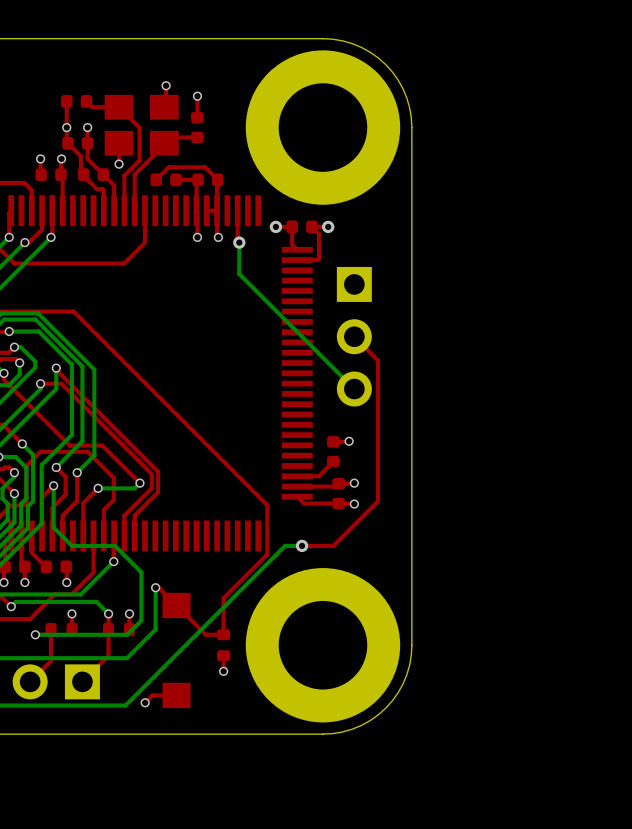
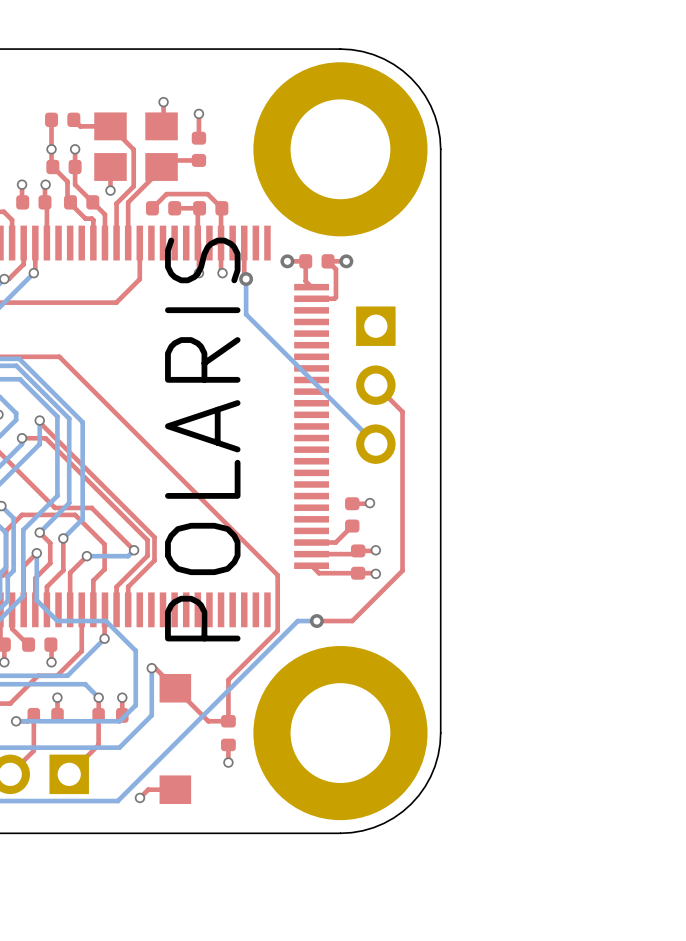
text: none -> POLARIS (202, 439)

